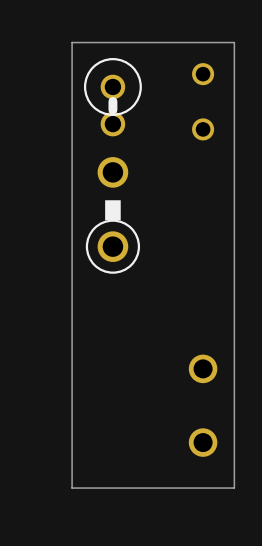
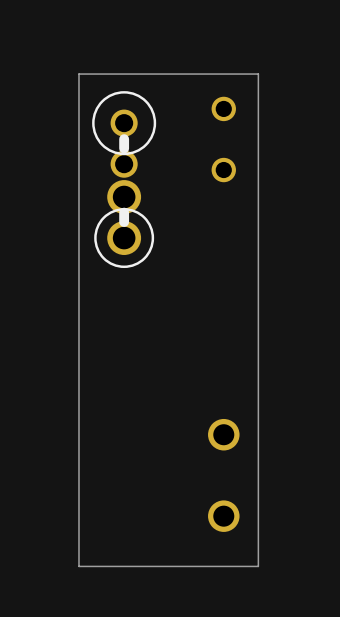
part: none -> (124, 224)
part: (112, 215) -> none

